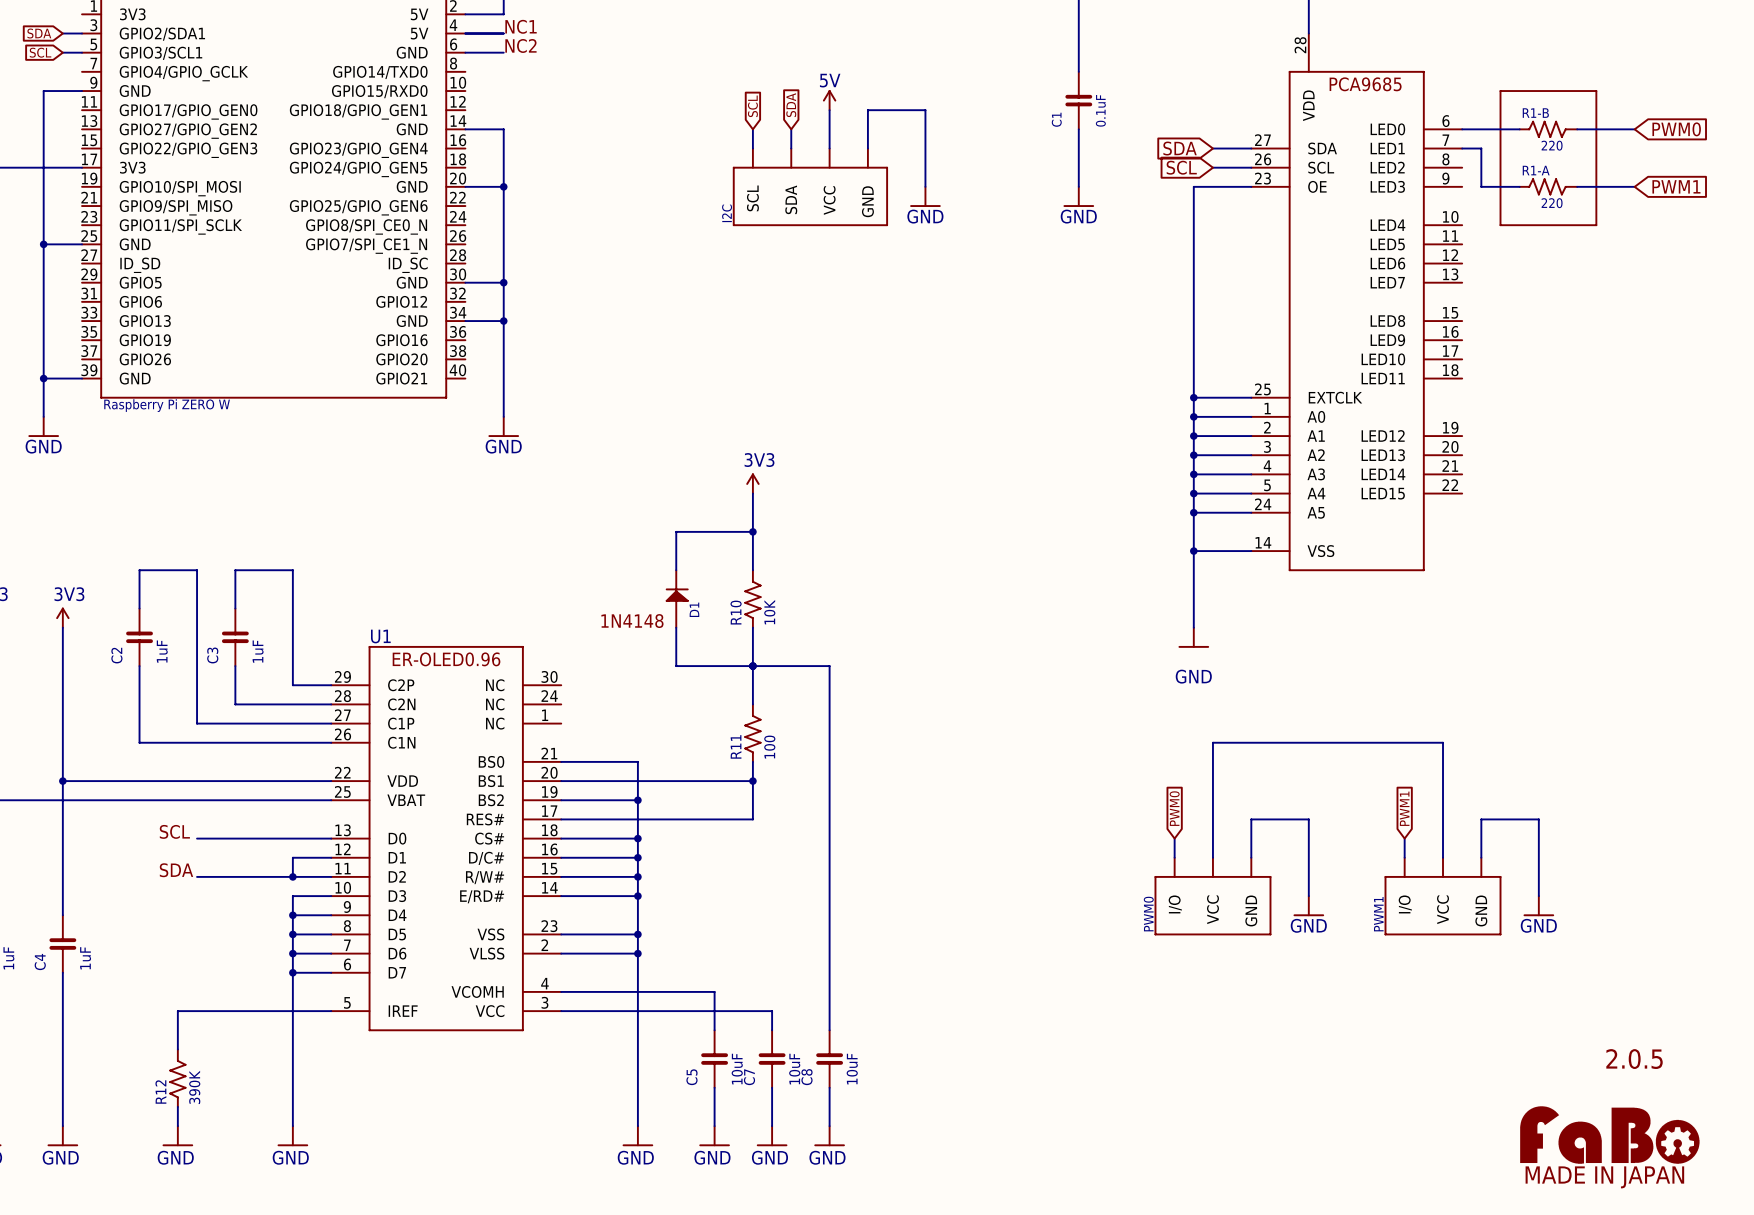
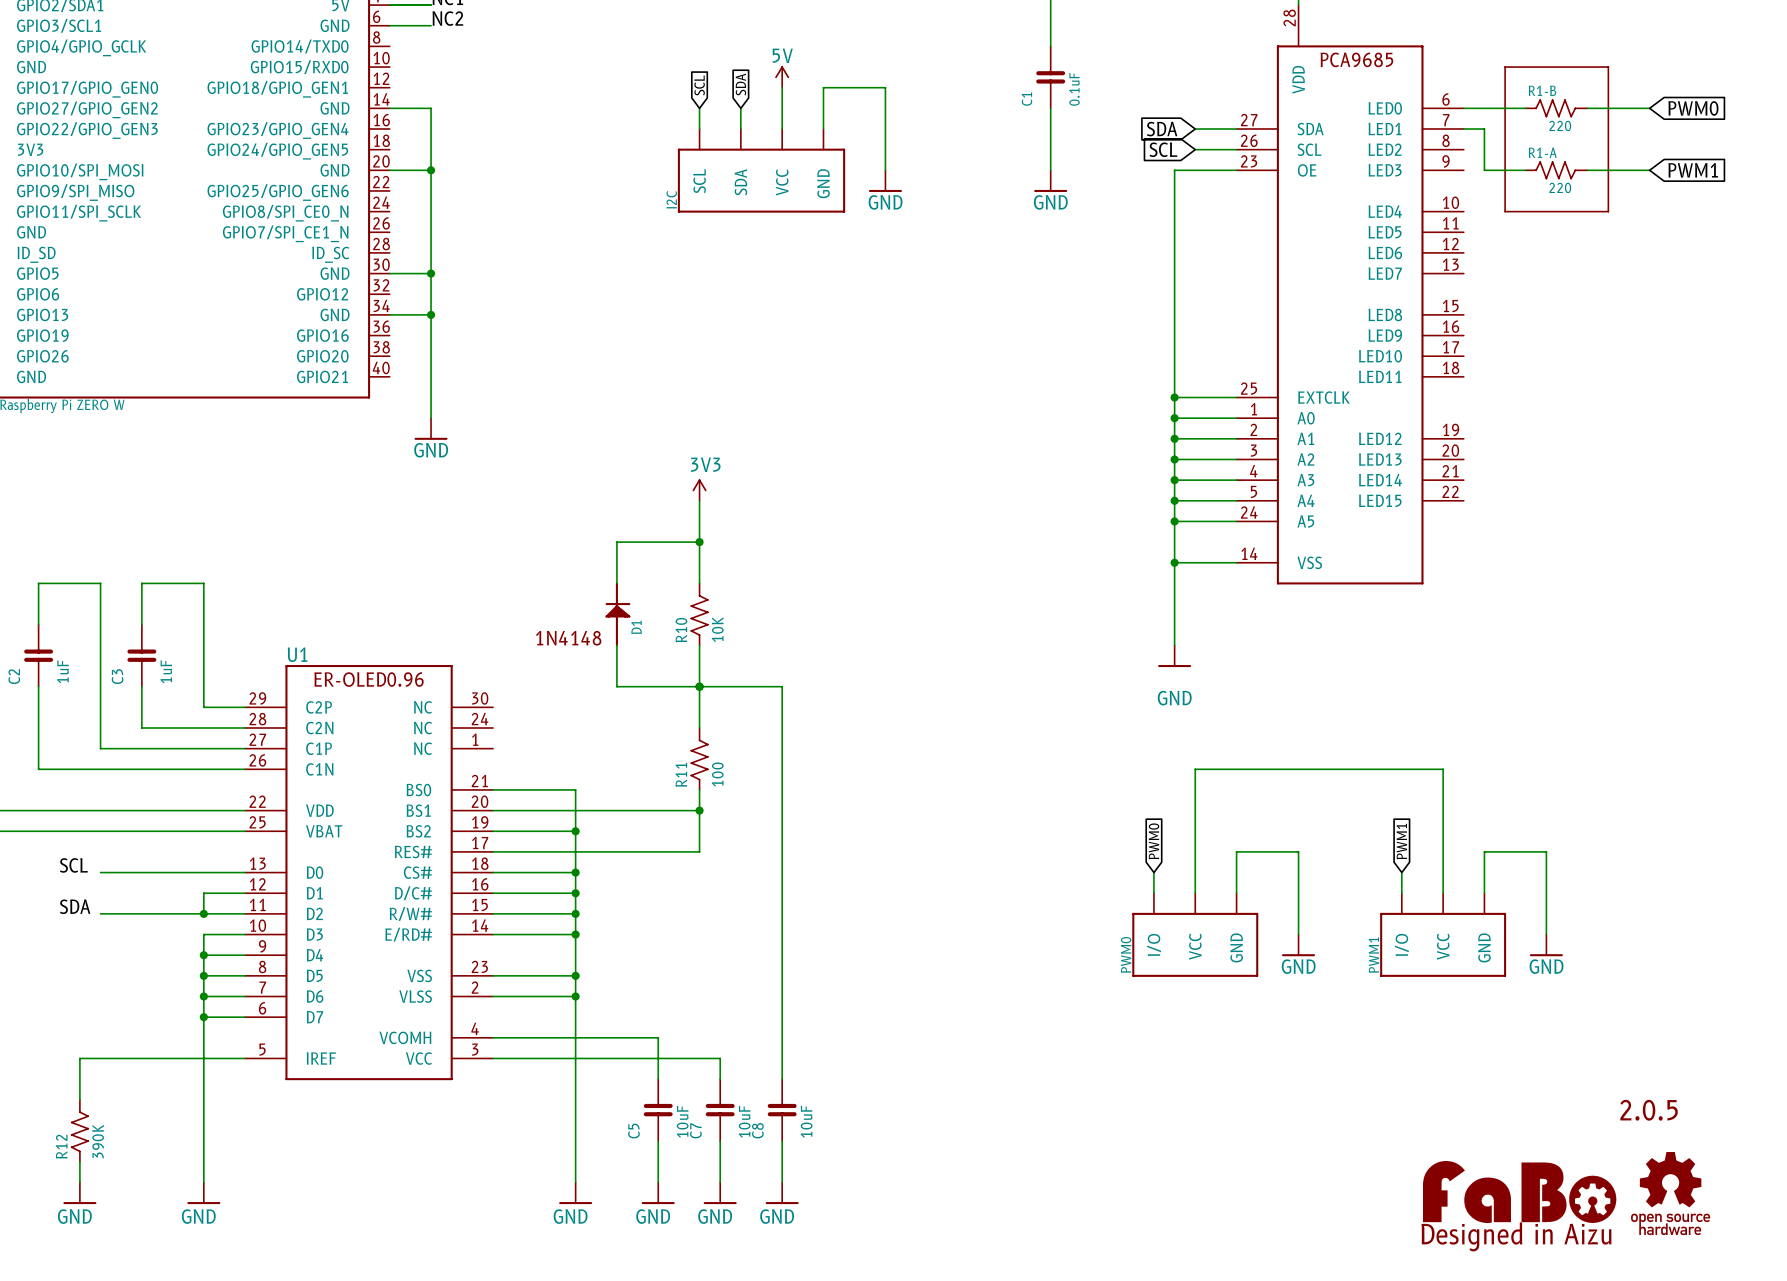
part: none -> (1519, 1192)
part: (1609, 1135) -> none
part: none -> (1670, 1193)

